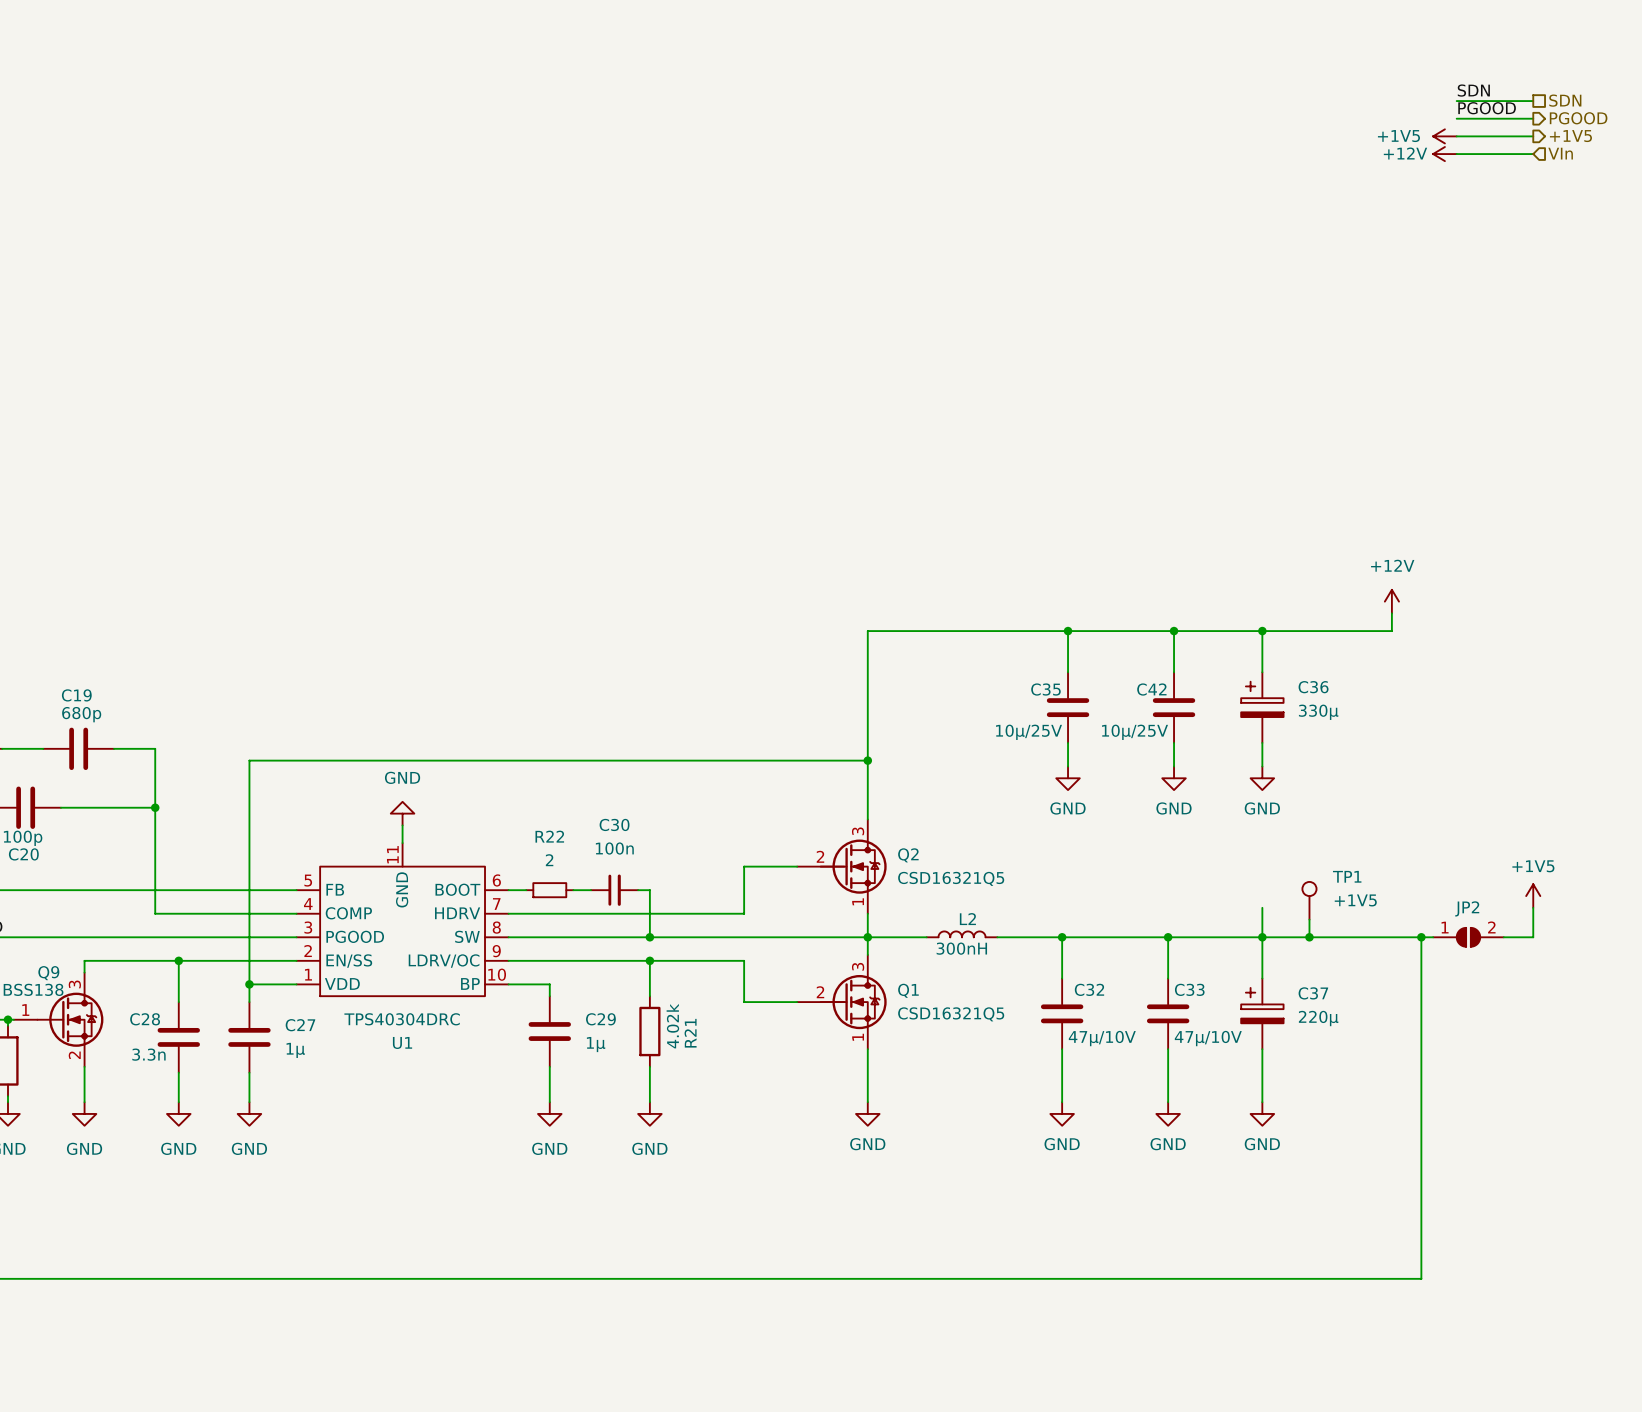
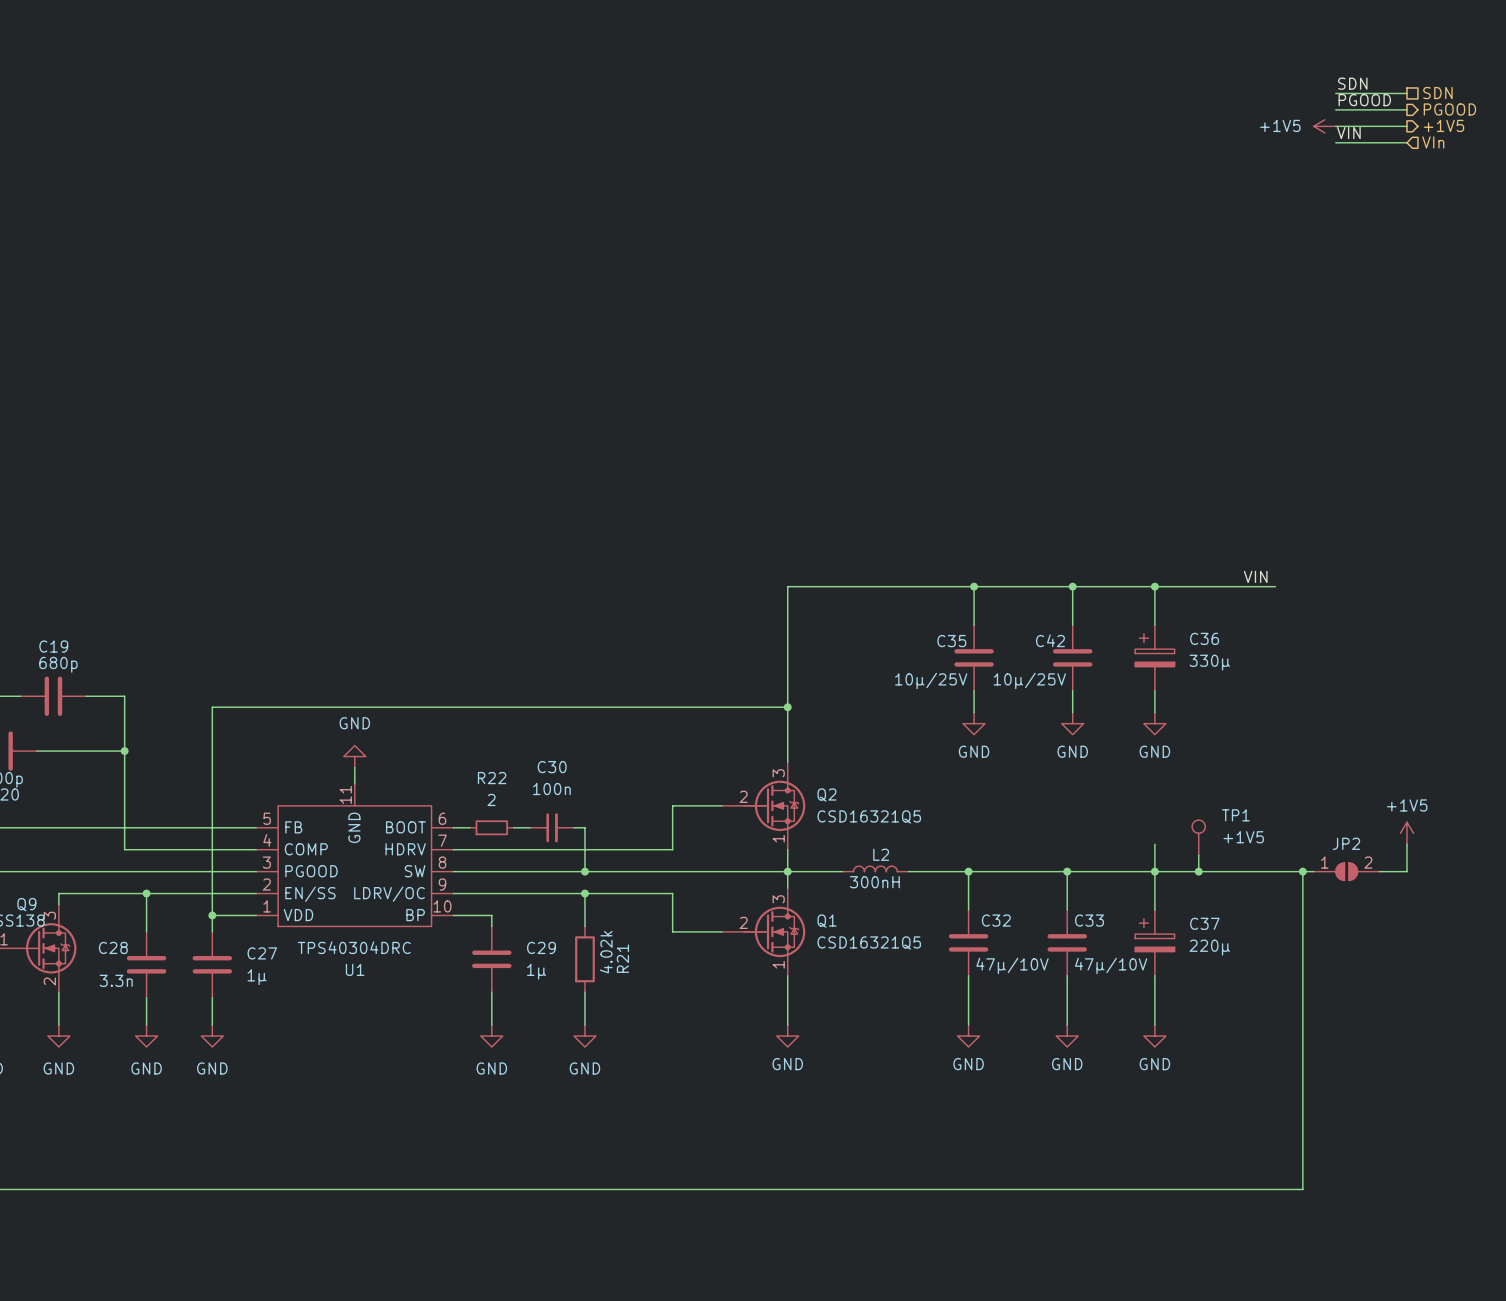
label: none -> VIN (1348, 133)
power symbol: +12V (1444, 154) -> none
power symbol: +12V (1391, 601) -> none
wire: (1391, 613) (1391, 631) -> none
label: none -> VIN (1255, 576)

